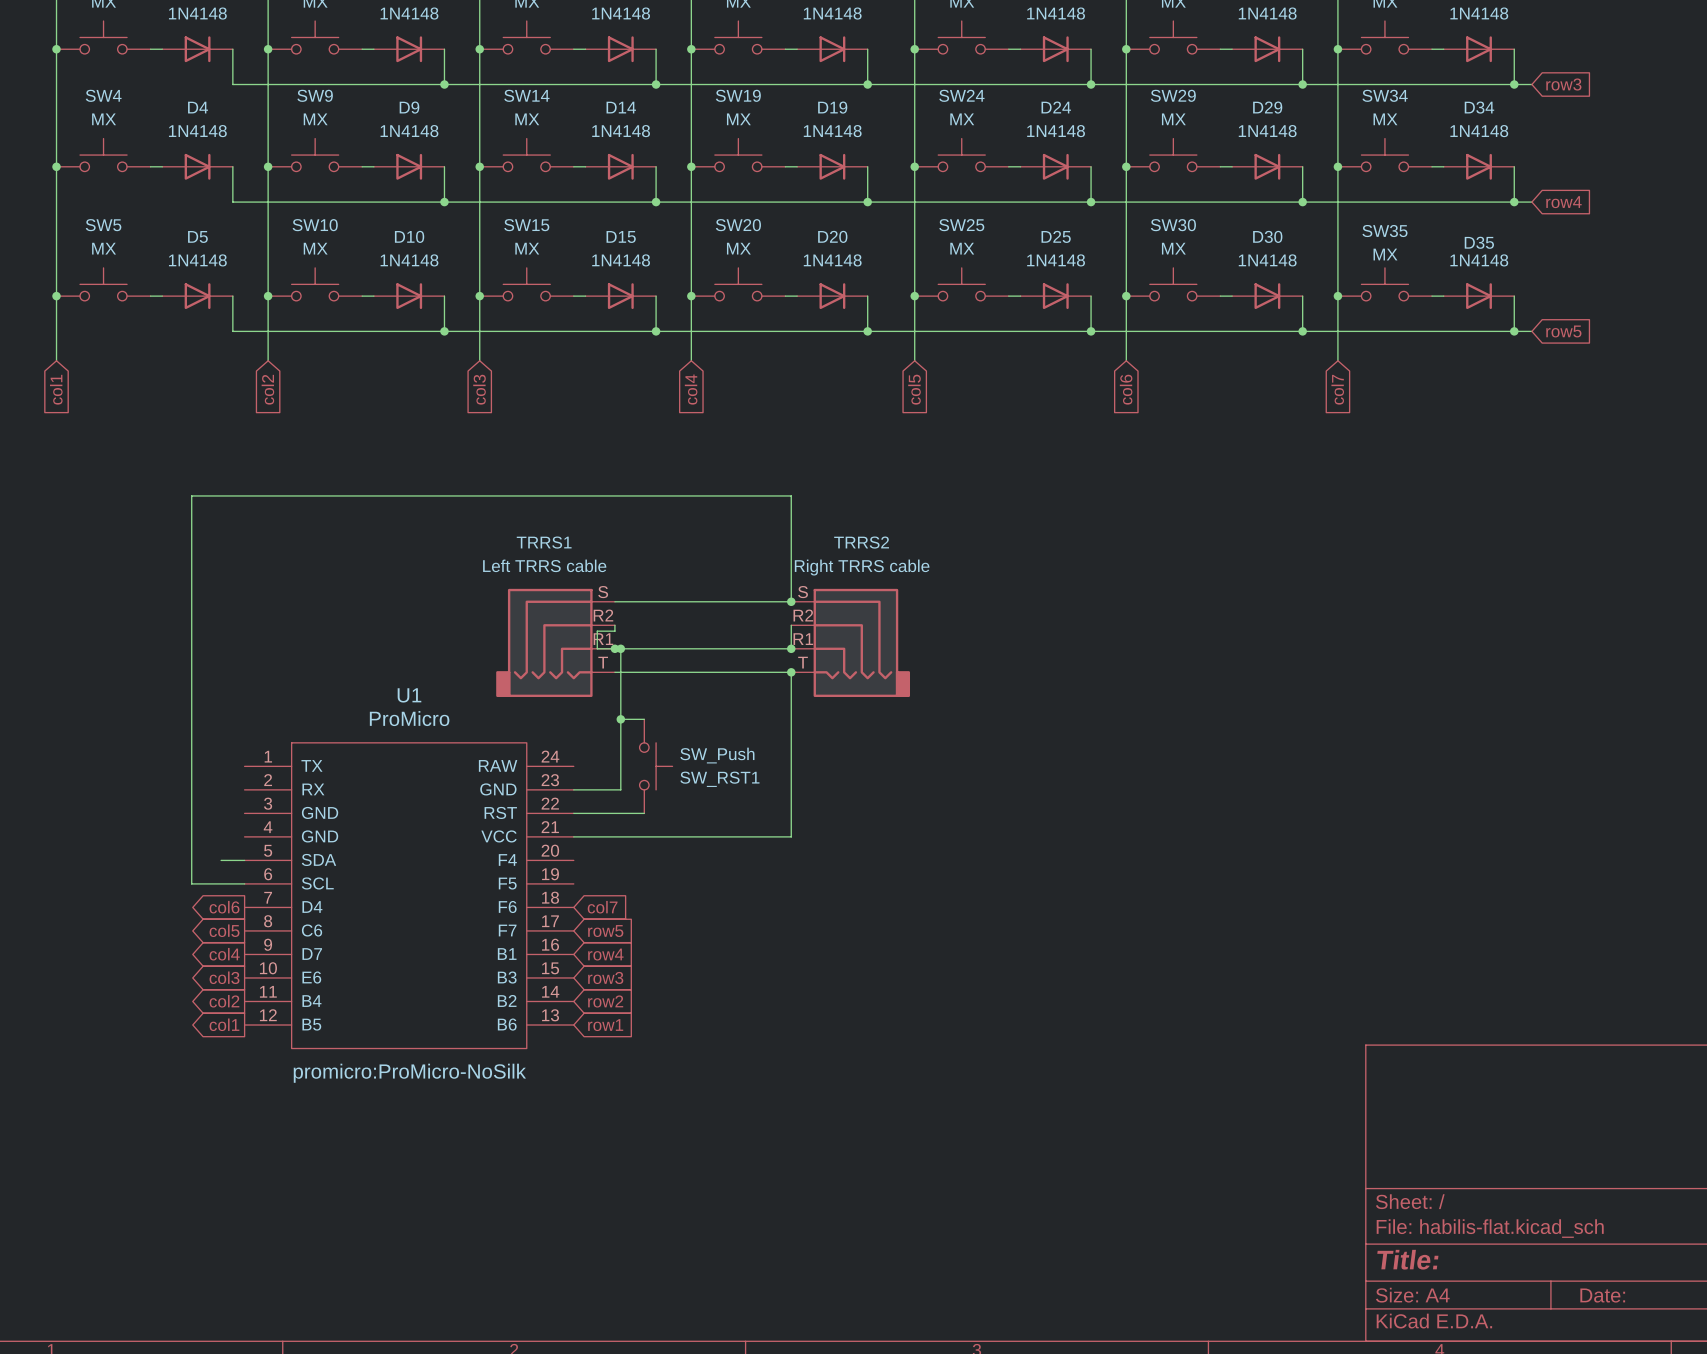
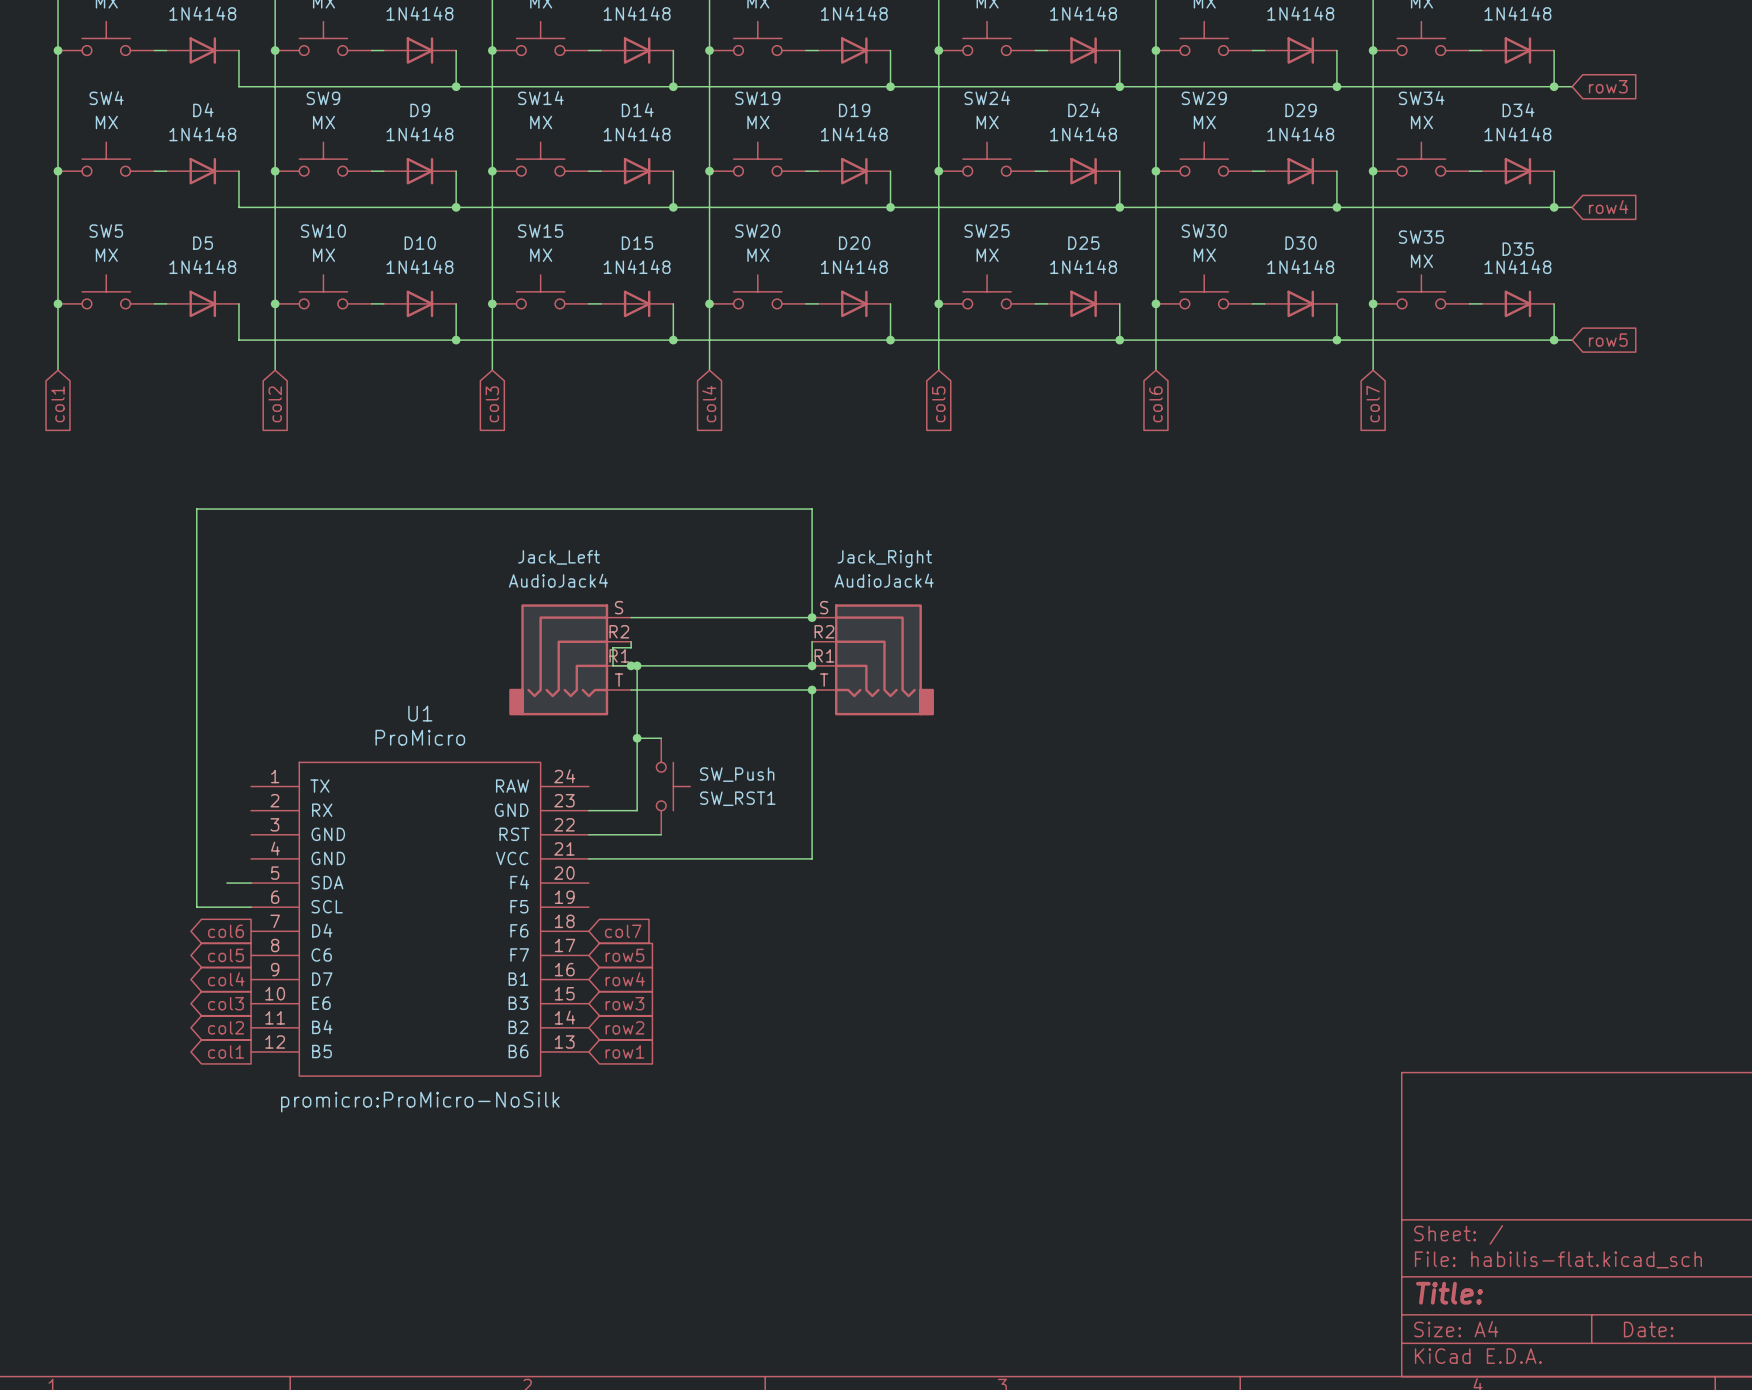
TRRS1 name: TRRS1 (544, 542) -> Jack_Left (559, 557)
TRRS2 name: TRRS2 (861, 542) -> Jack_Right (884, 558)
TRRS1 value: Left TRRS cable (544, 565) -> AudioJack4 (558, 580)
TRRS2 value: Right TRRS cable (862, 567) -> AudioJack4 (884, 580)

